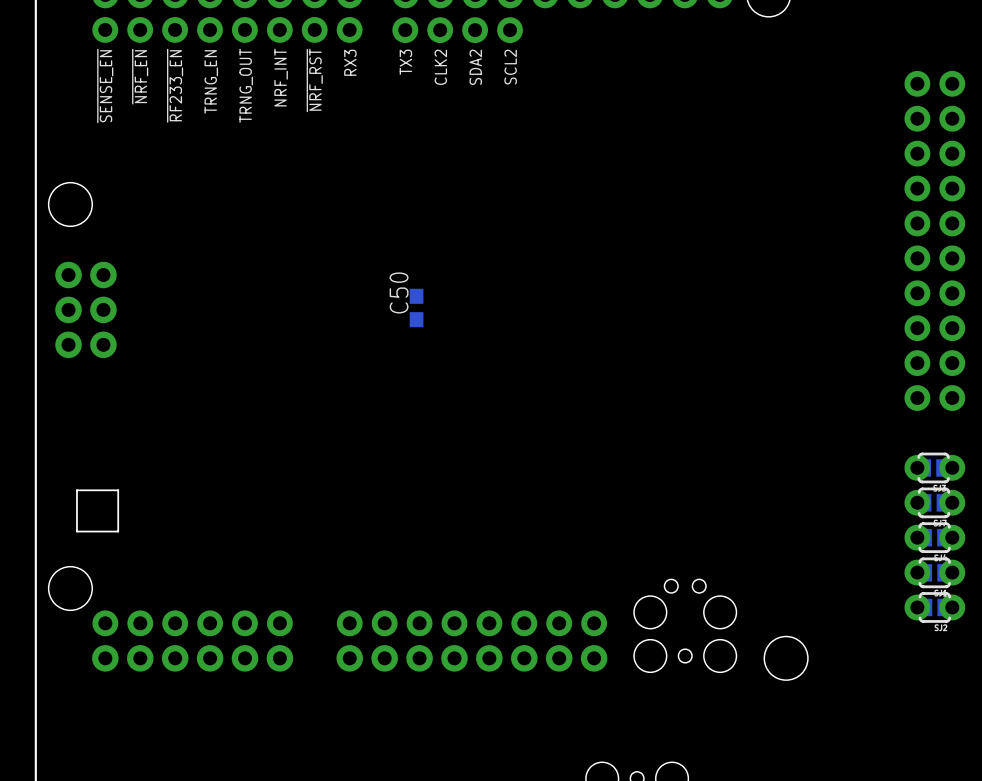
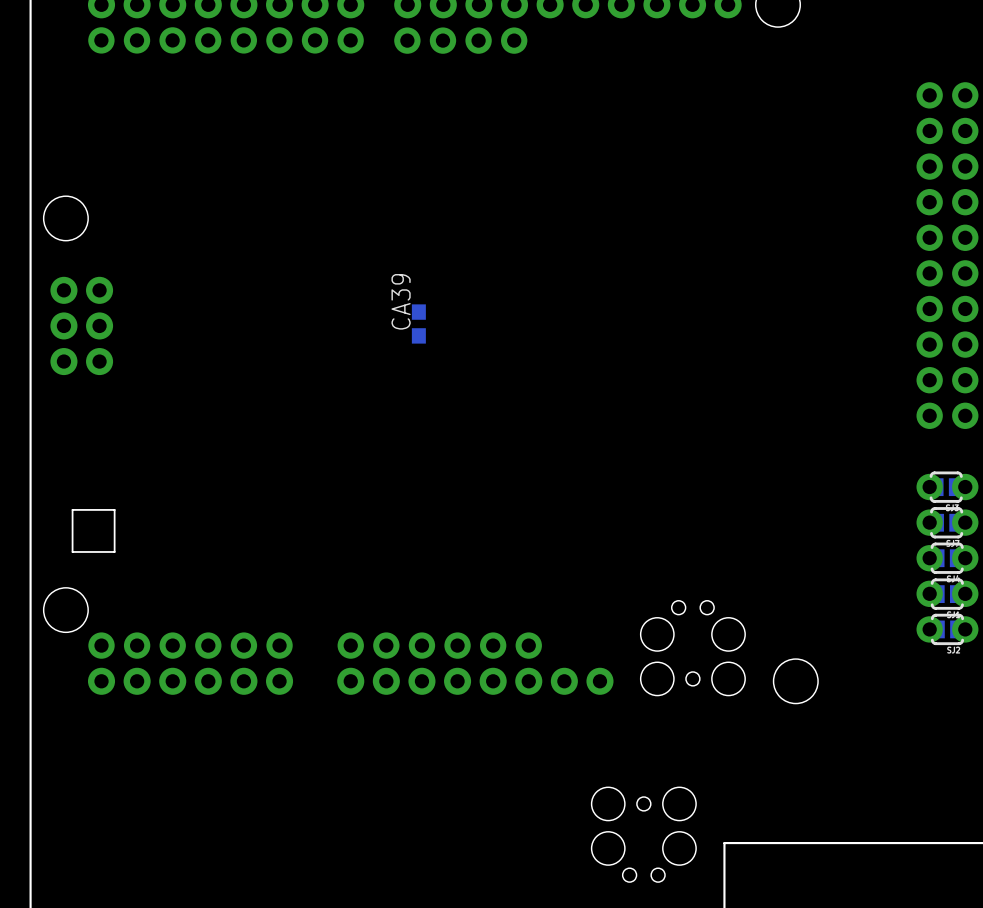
text: RX3 (350, 62) -> none
text: TX3 (405, 62) -> none
text: CLK2 (440, 67) -> none
text: SDA2 (475, 67) -> none
text: SCL2 (510, 67) -> none
text: ~{NRF_EN} (140, 76) -> none
text: NRF_INT (281, 77) -> none
text: ~{NRF_RST} (314, 80) -> none
text: TRNG_EN (211, 81) -> none
text: ~{SENSE_EN} (105, 85) -> none
text: ~{RF233_EN} (175, 85) -> none
text: TRNG_OUT (246, 85) -> none
C50 name: C50 (399, 292) -> CA39 (401, 301)
part: (471, 623) -> none

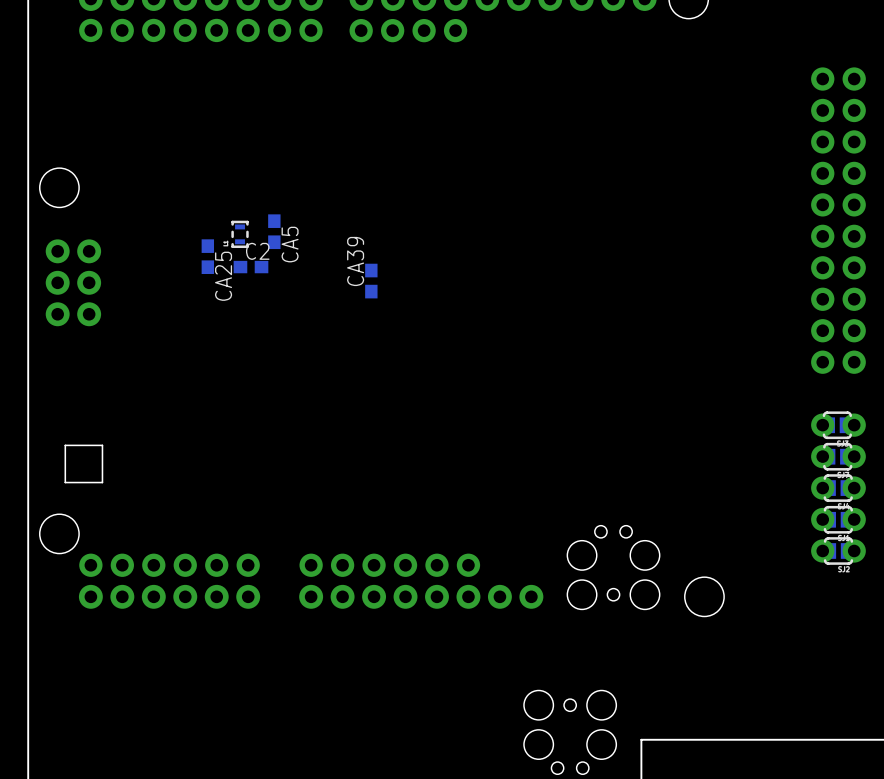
CA5: none -> (274, 231)
part: none -> (240, 234)
CA25: none -> (207, 256)
C2: none -> (250, 267)

